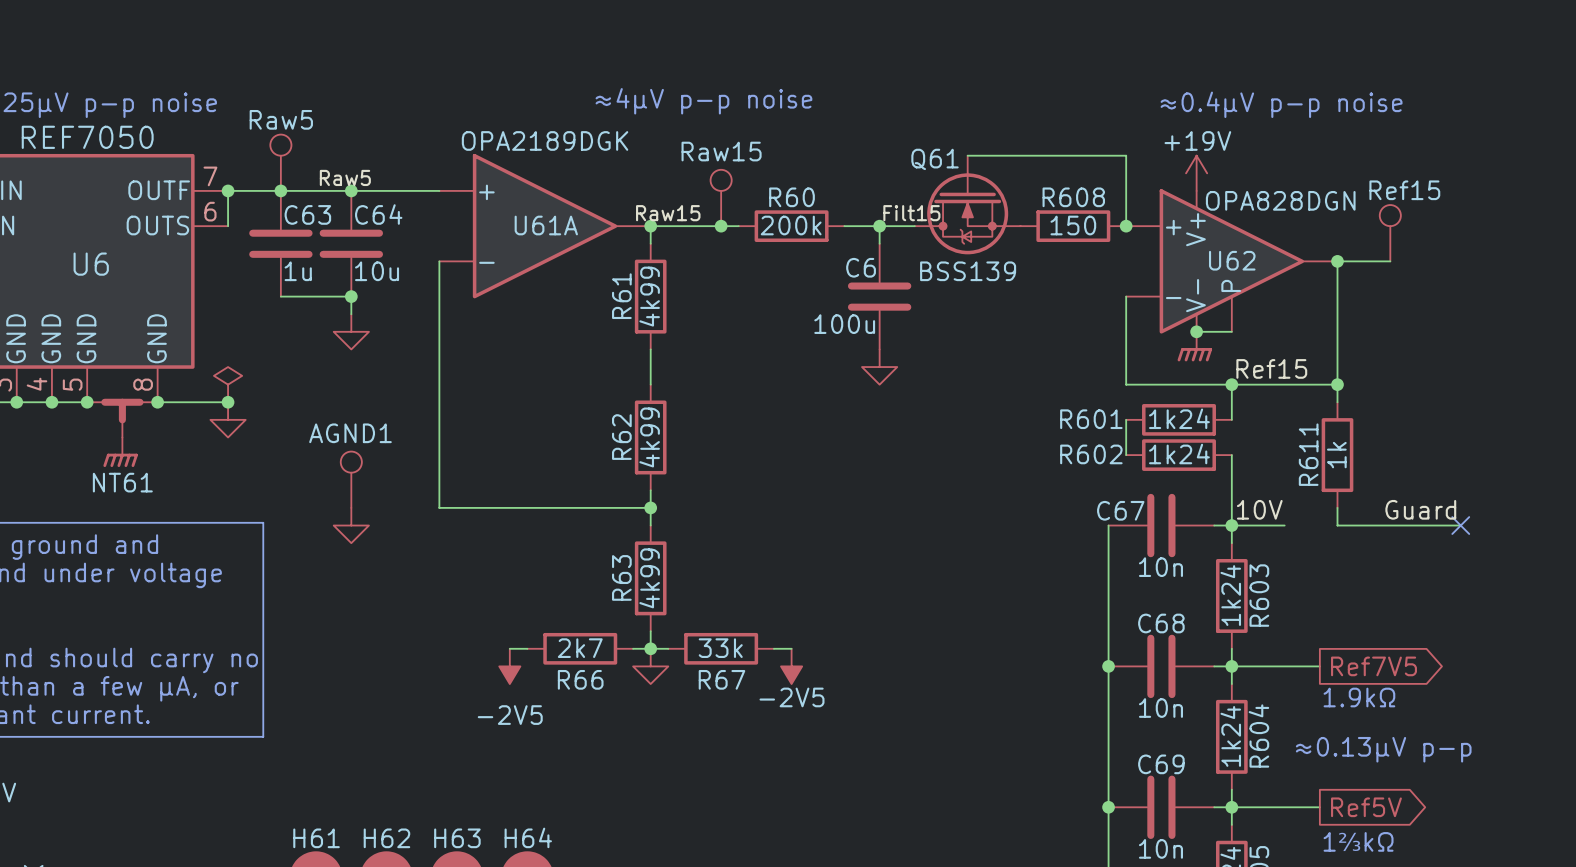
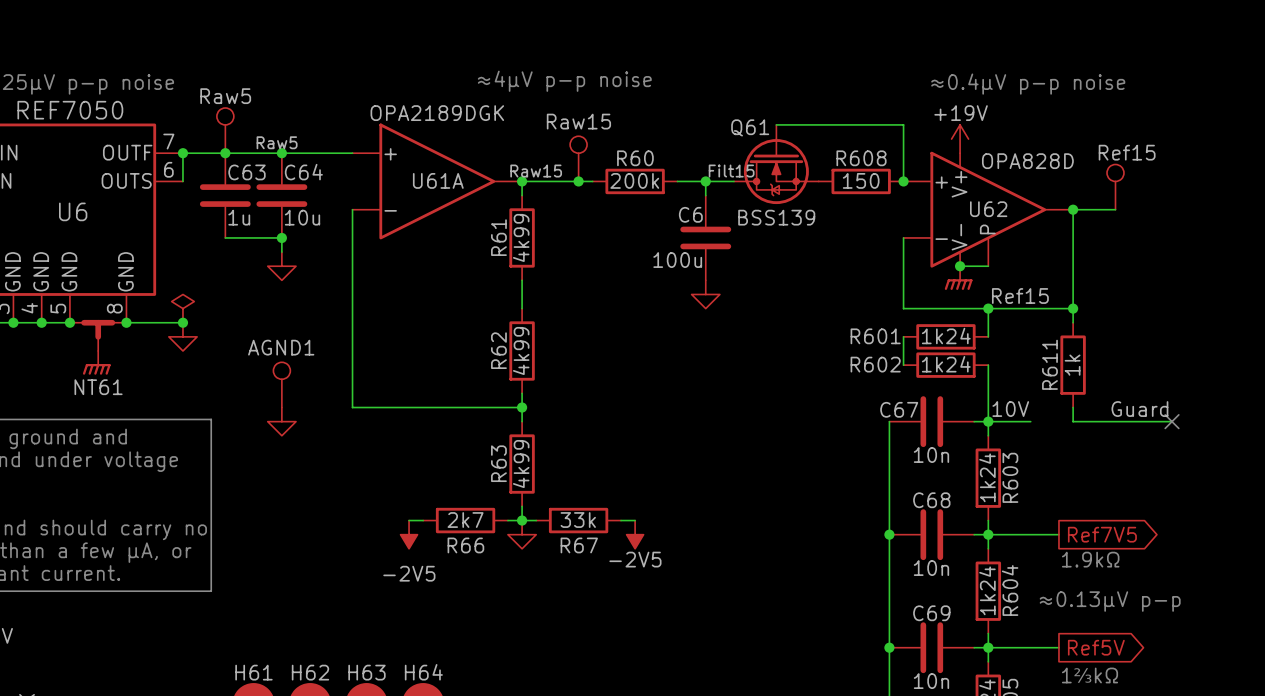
U62 value: OPA828DGN (1280, 200) -> OPA828D (1027, 161)

